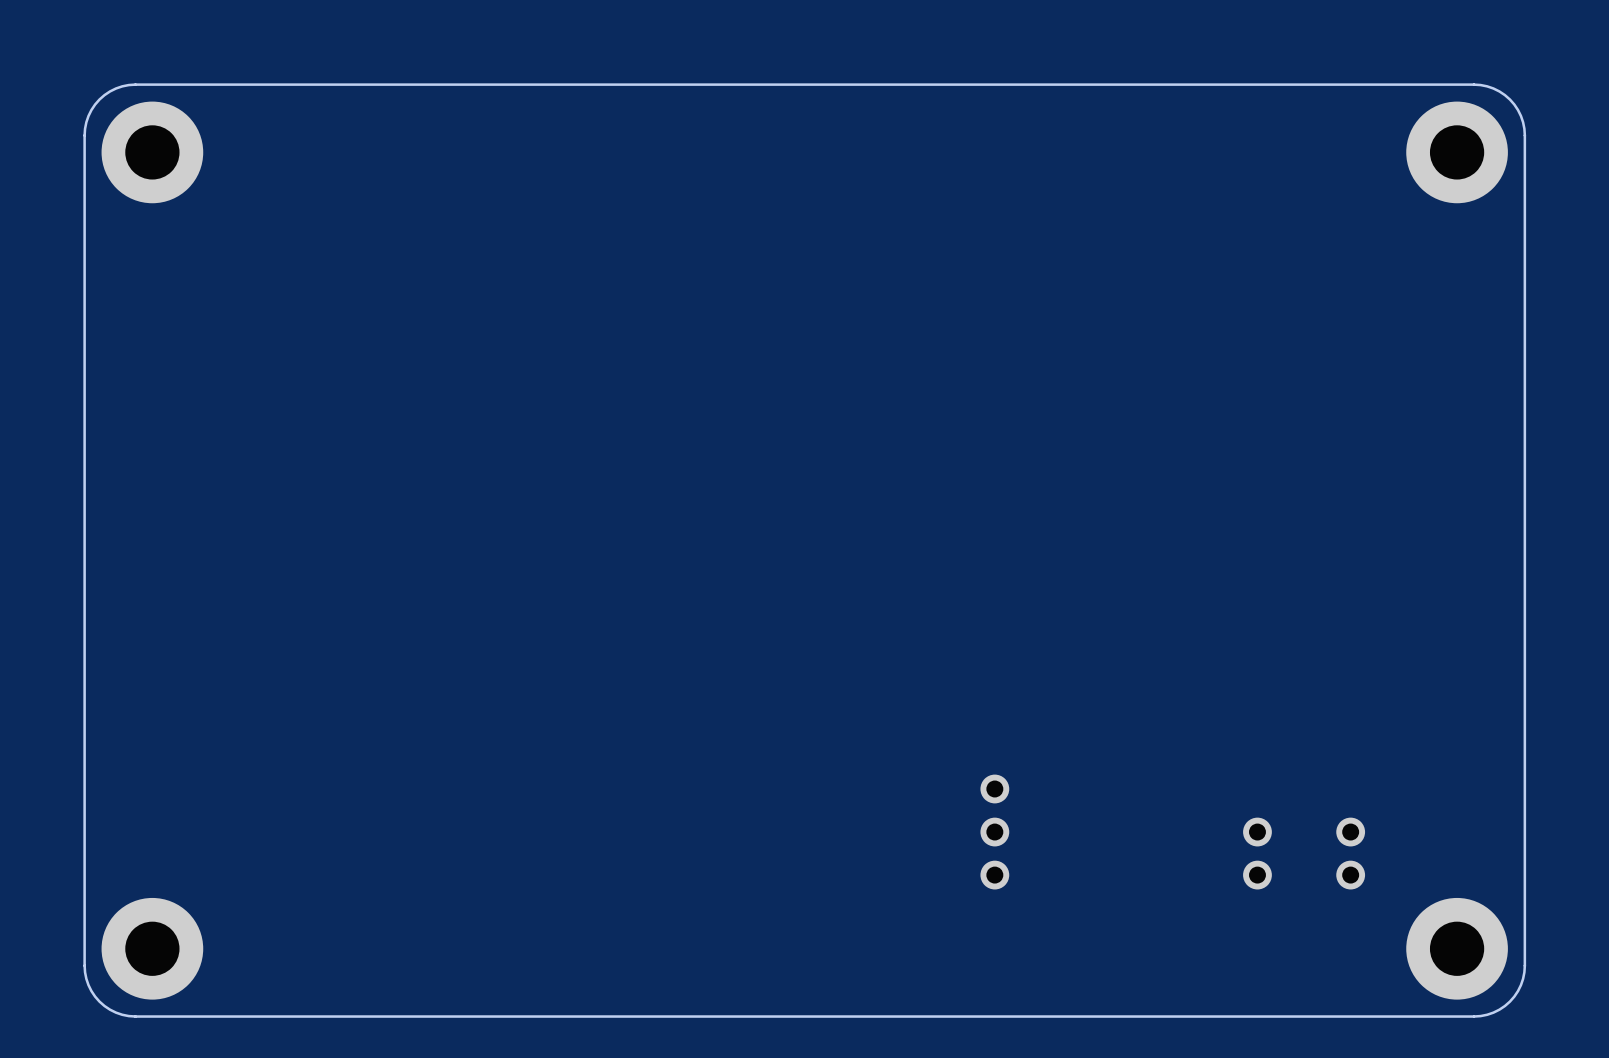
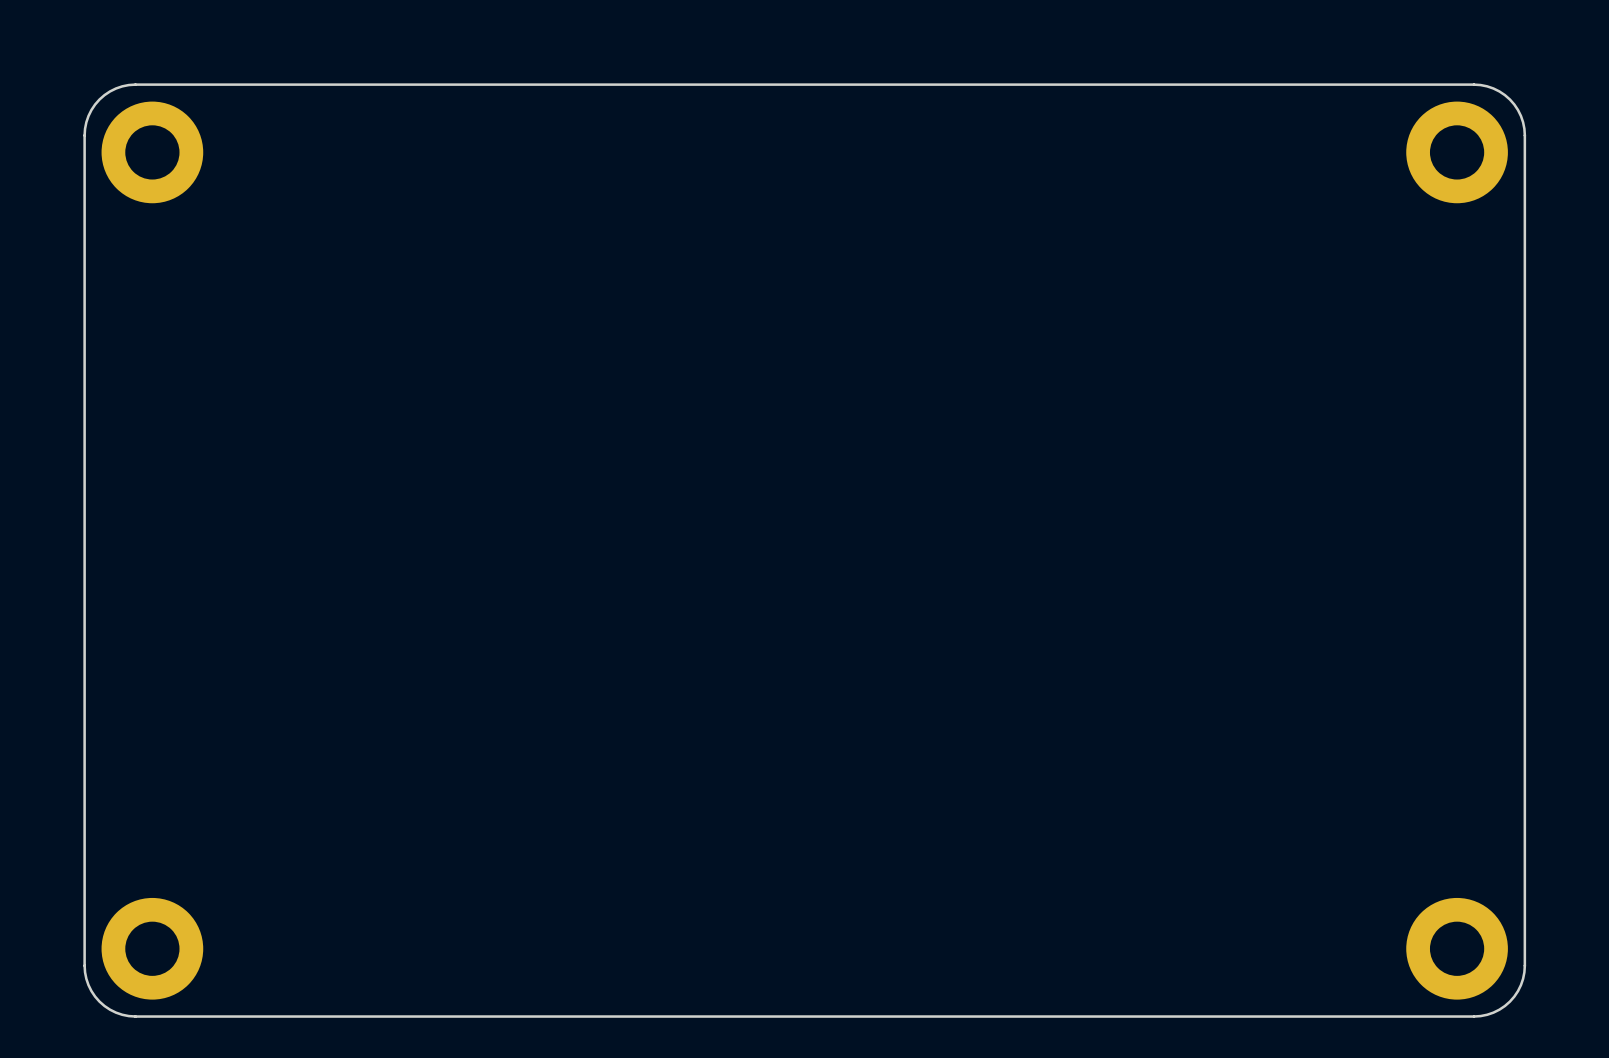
part: (994, 832) -> none
part: (1257, 853) -> none
part: (1350, 853) -> none

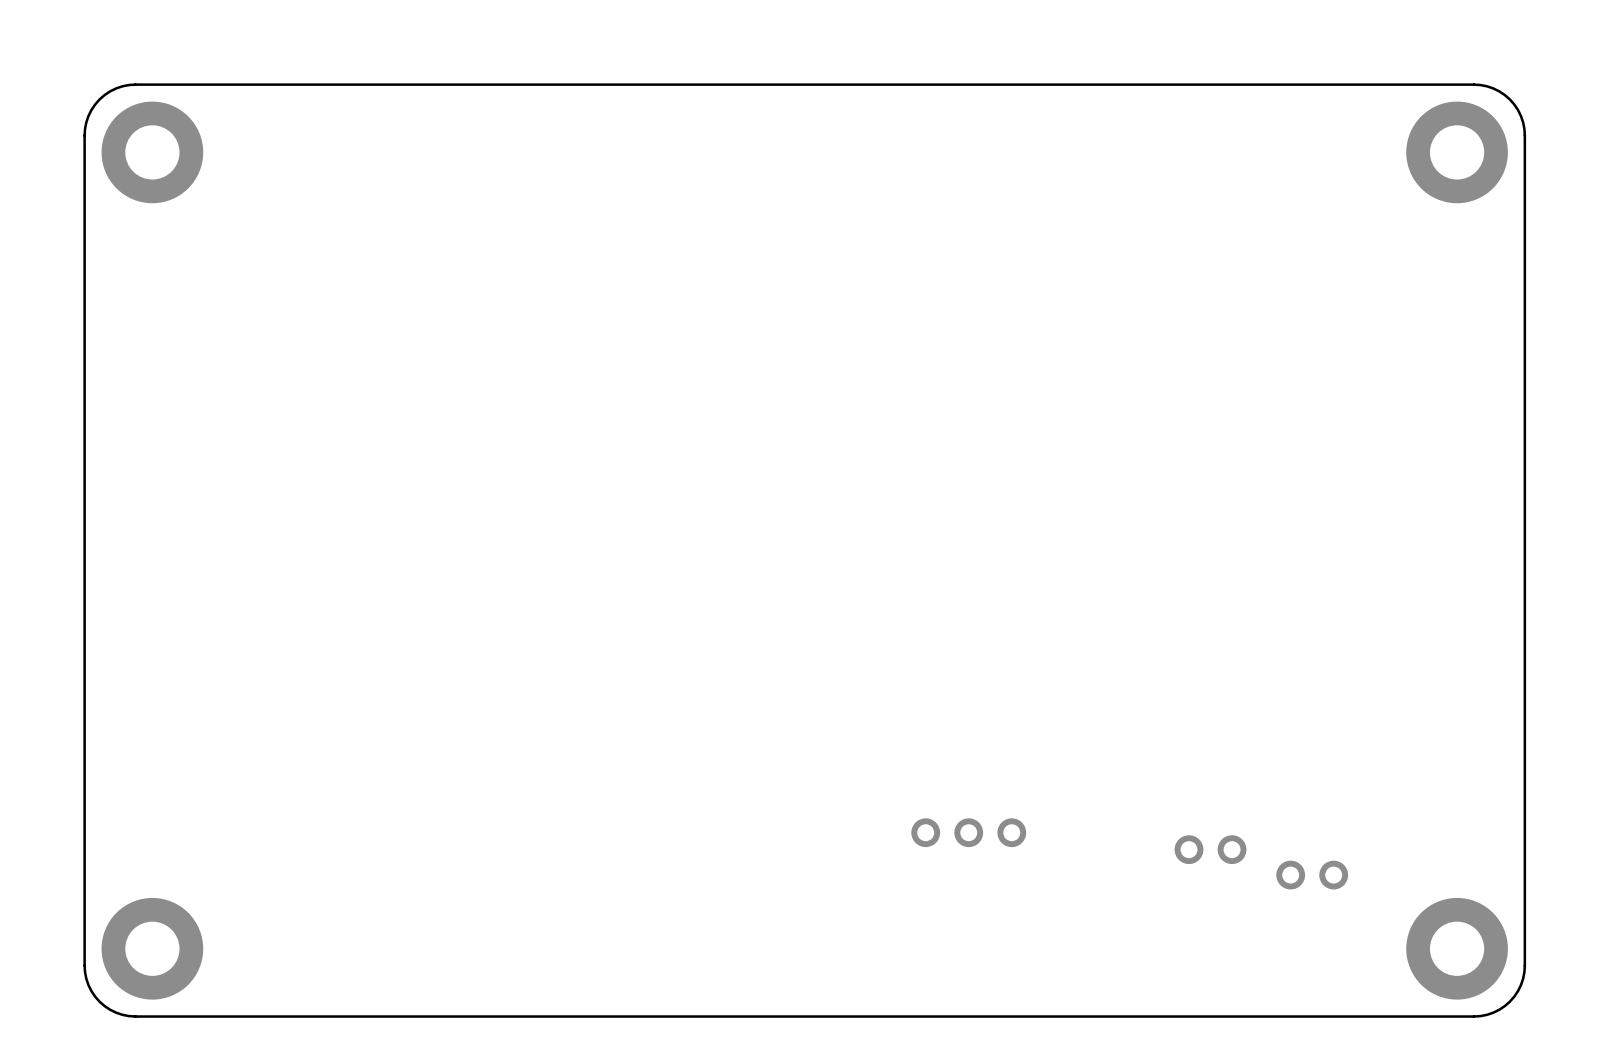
part: none -> (968, 832)
part: none -> (1210, 849)
part: none -> (1312, 875)

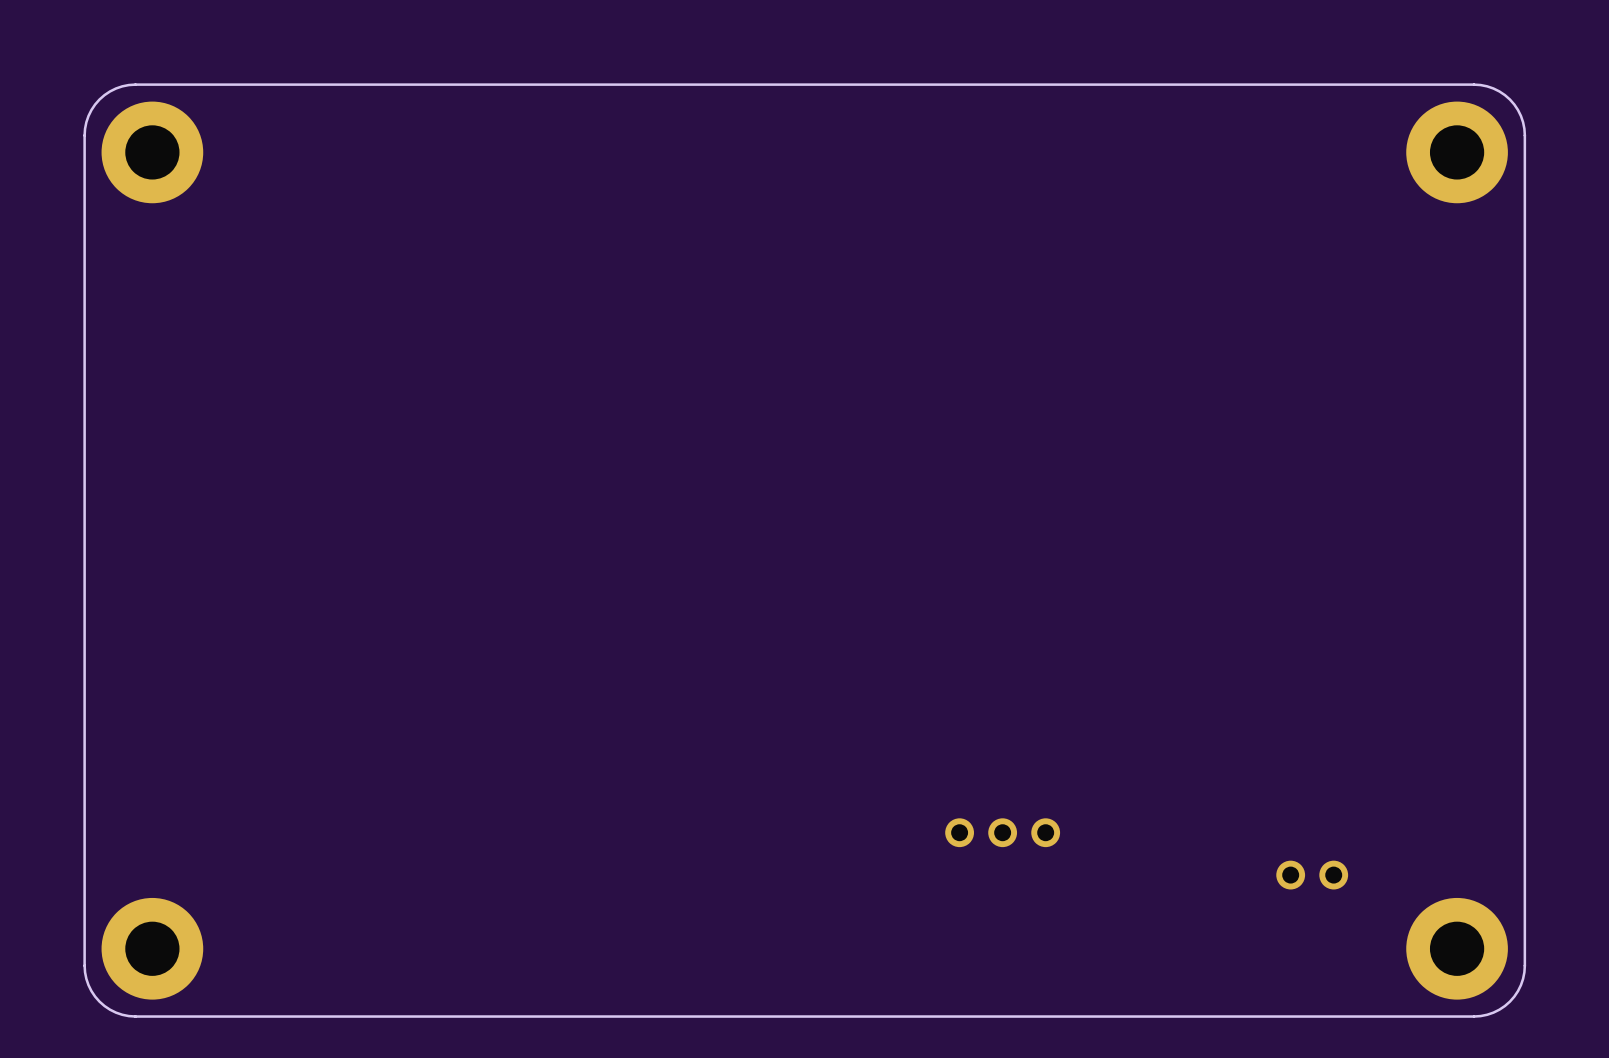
part position: (968, 832) -> (1002, 832)
part: (1210, 849) -> none

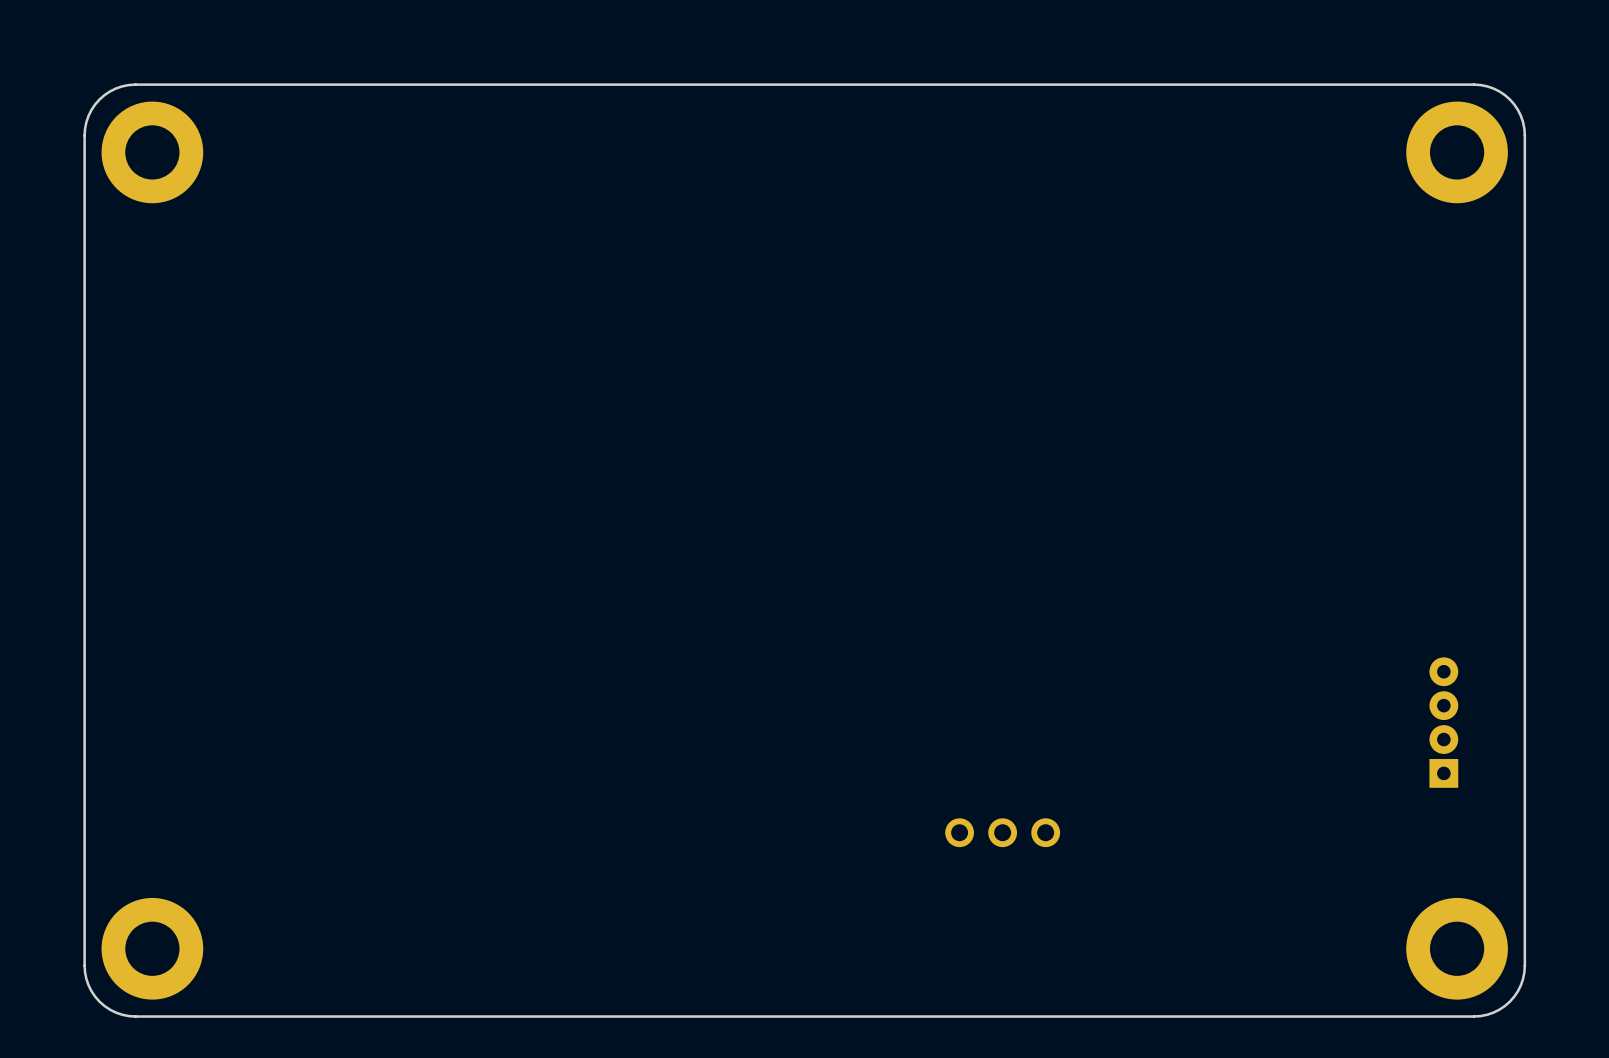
part: none -> (1443, 722)
part: (1312, 875) -> none

